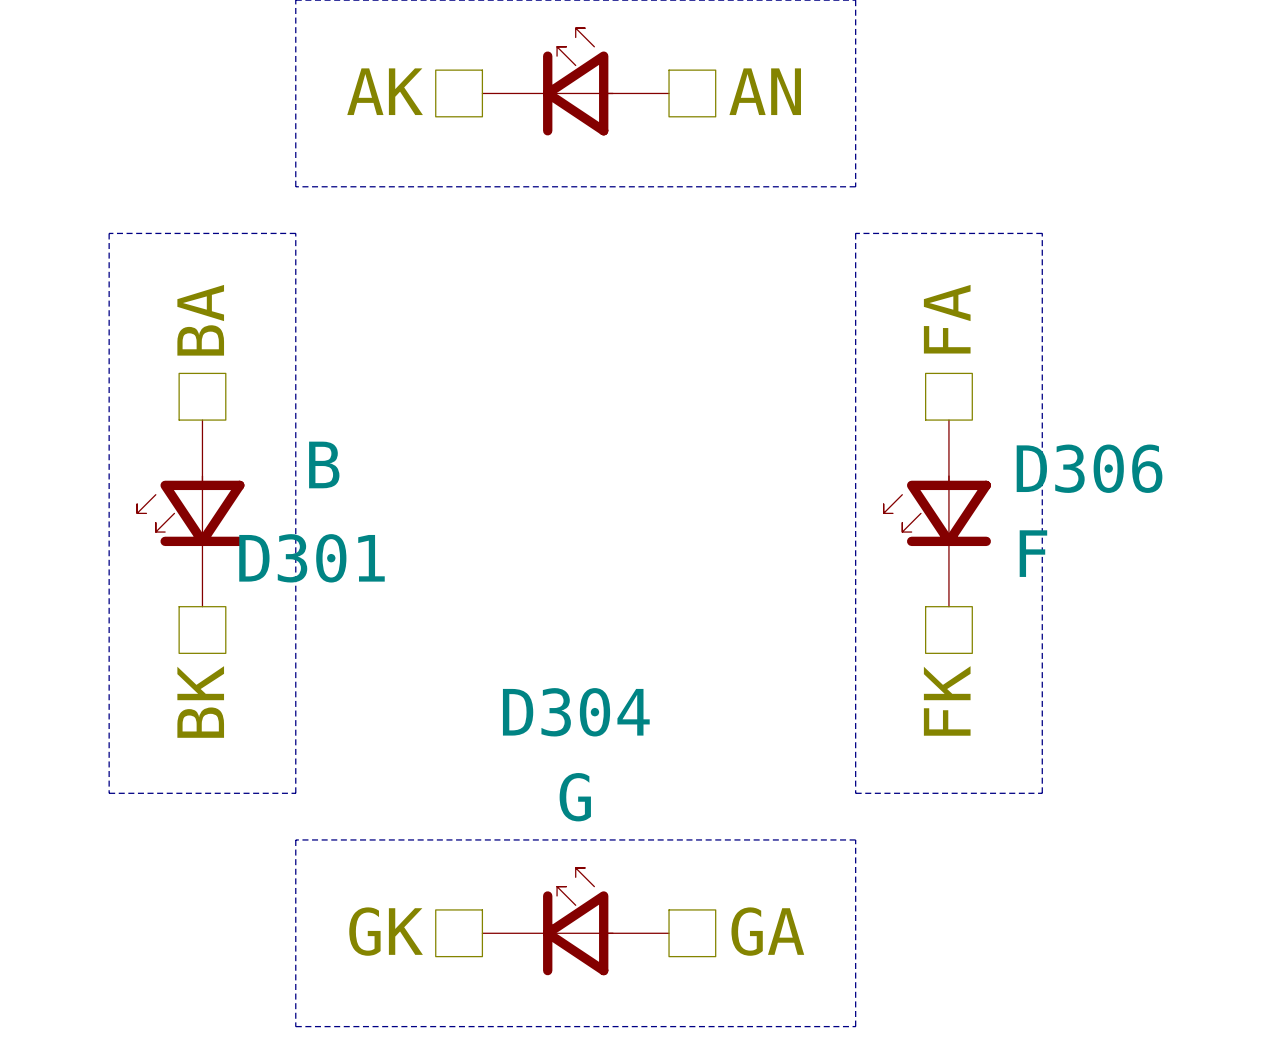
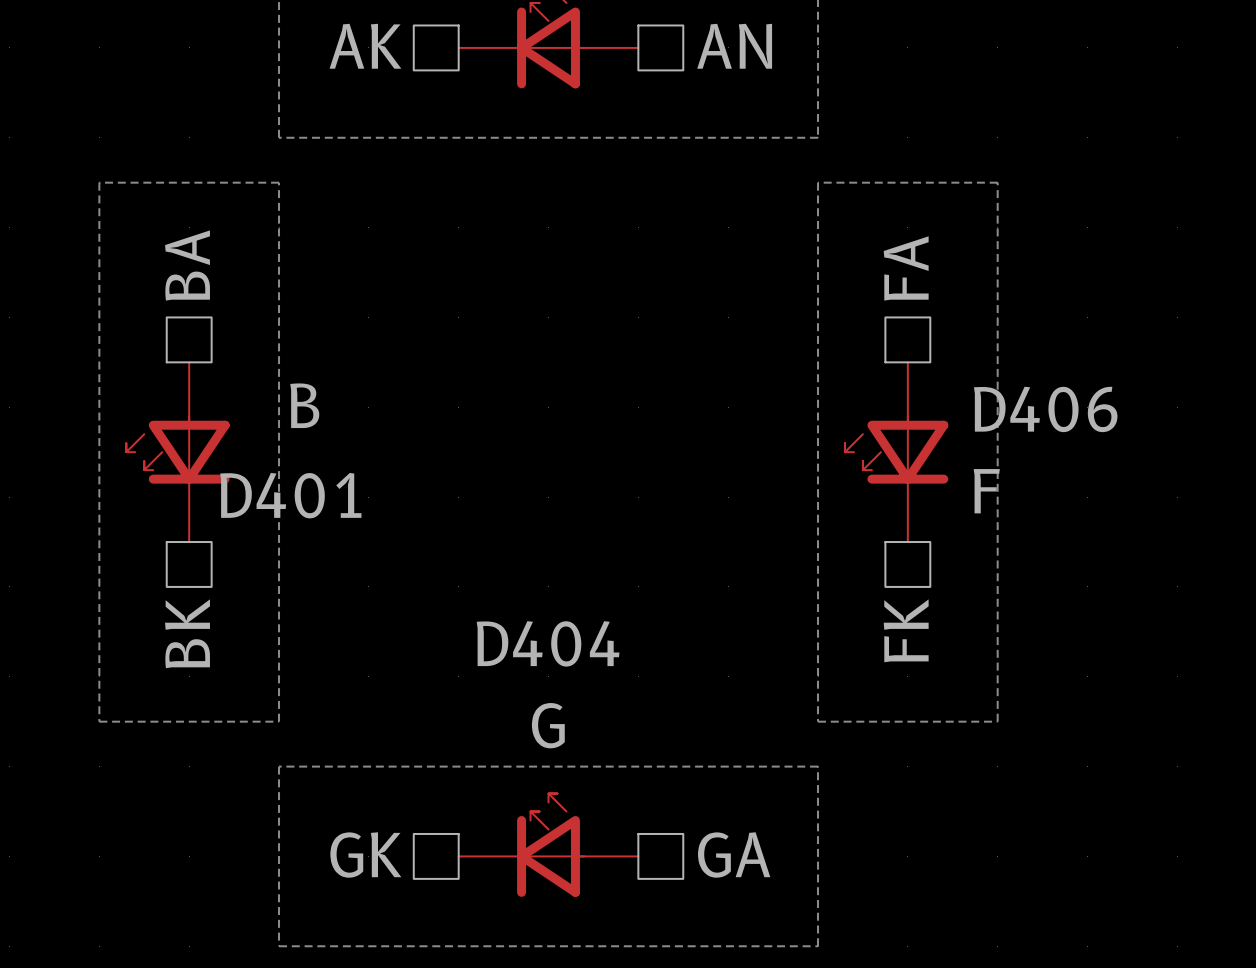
D306 name: D306 (1089, 468) -> D406 (1045, 409)
D301 name: D301 (311, 558) -> D401 (290, 495)
D304 name: D304 (576, 712) -> D404 (548, 643)

